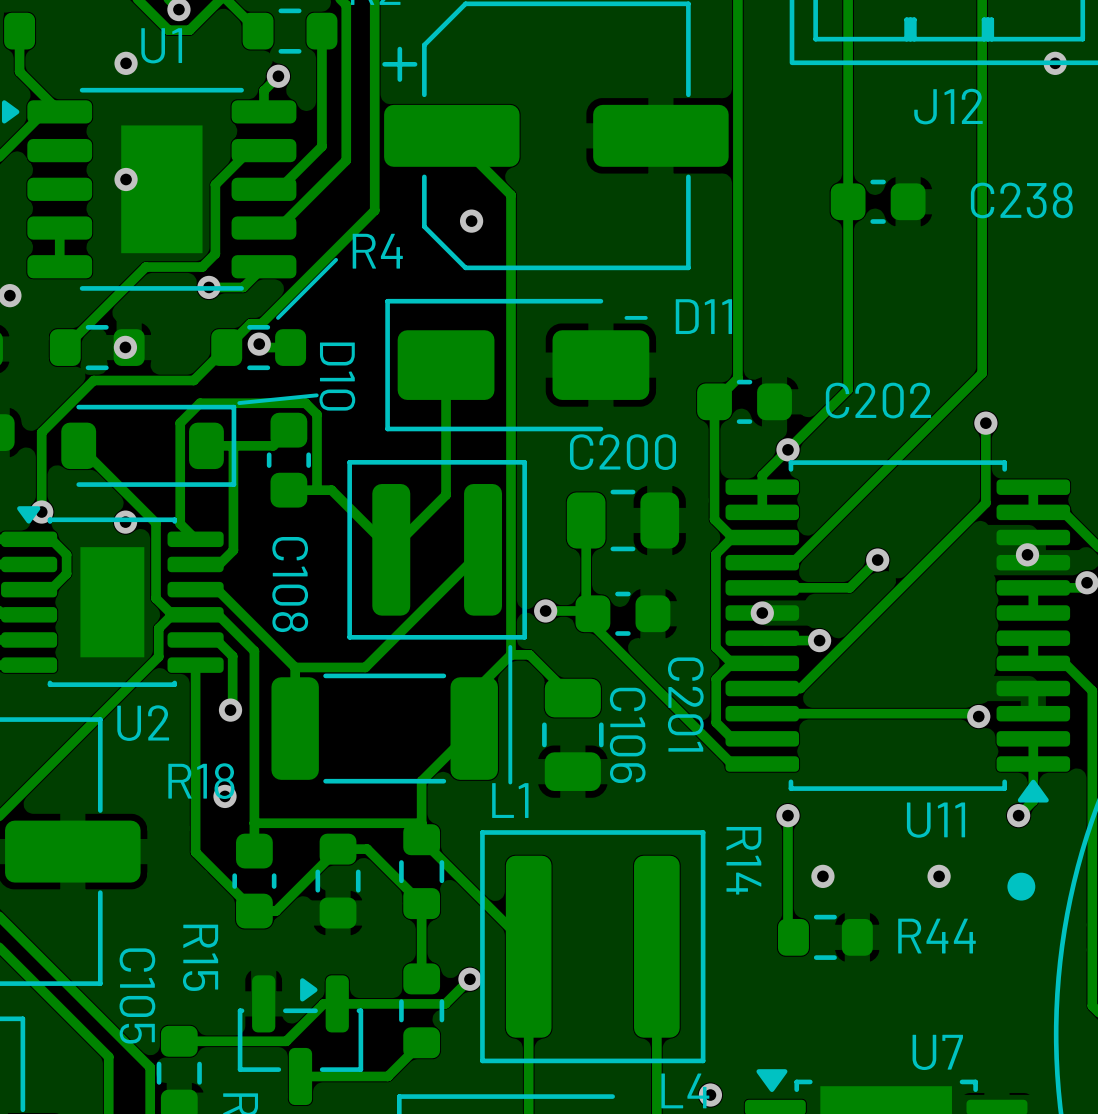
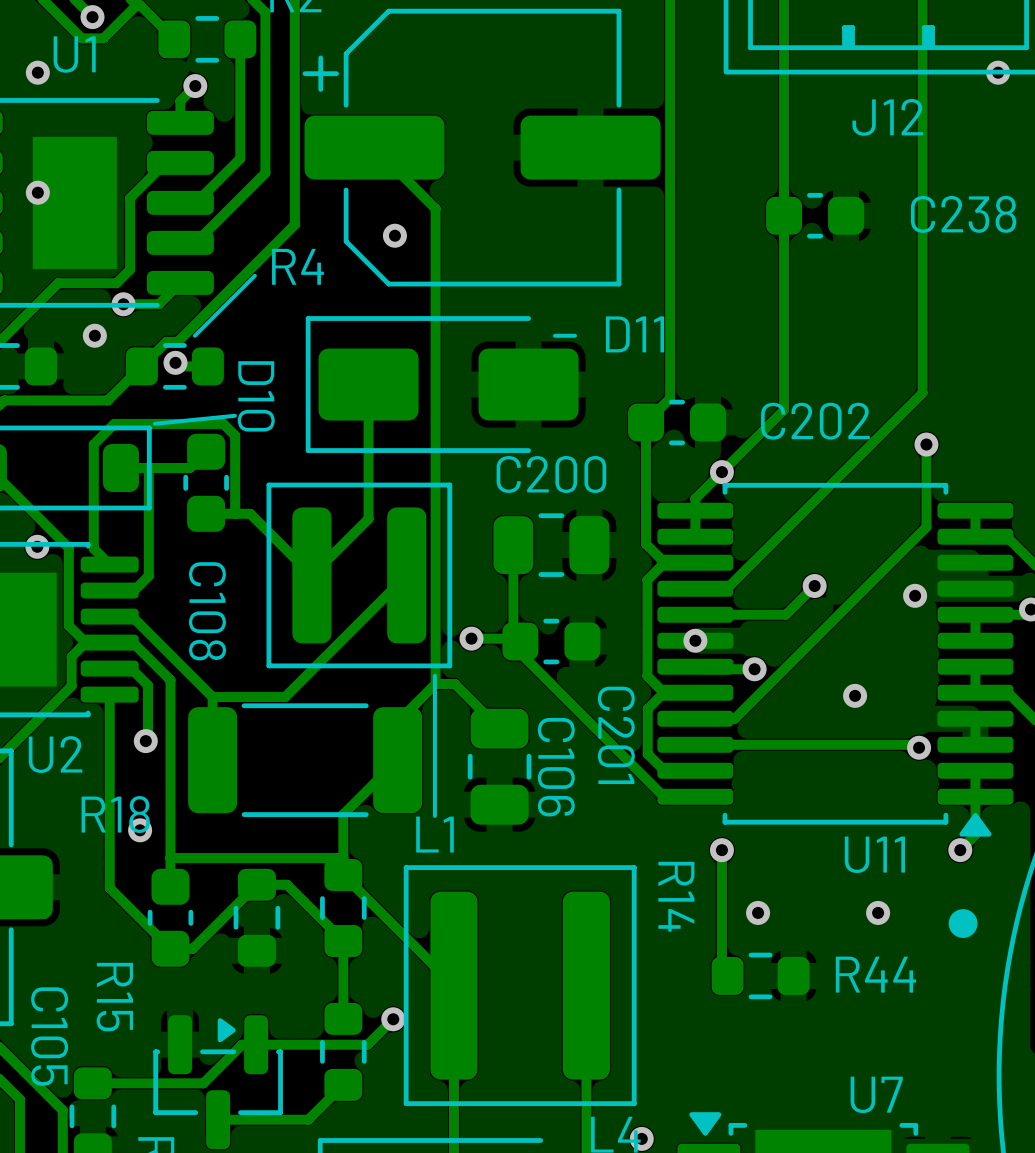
via position: (125, 347) -> (94, 335)
via position: (1027, 554) -> (915, 595)
via: none -> (855, 695)

